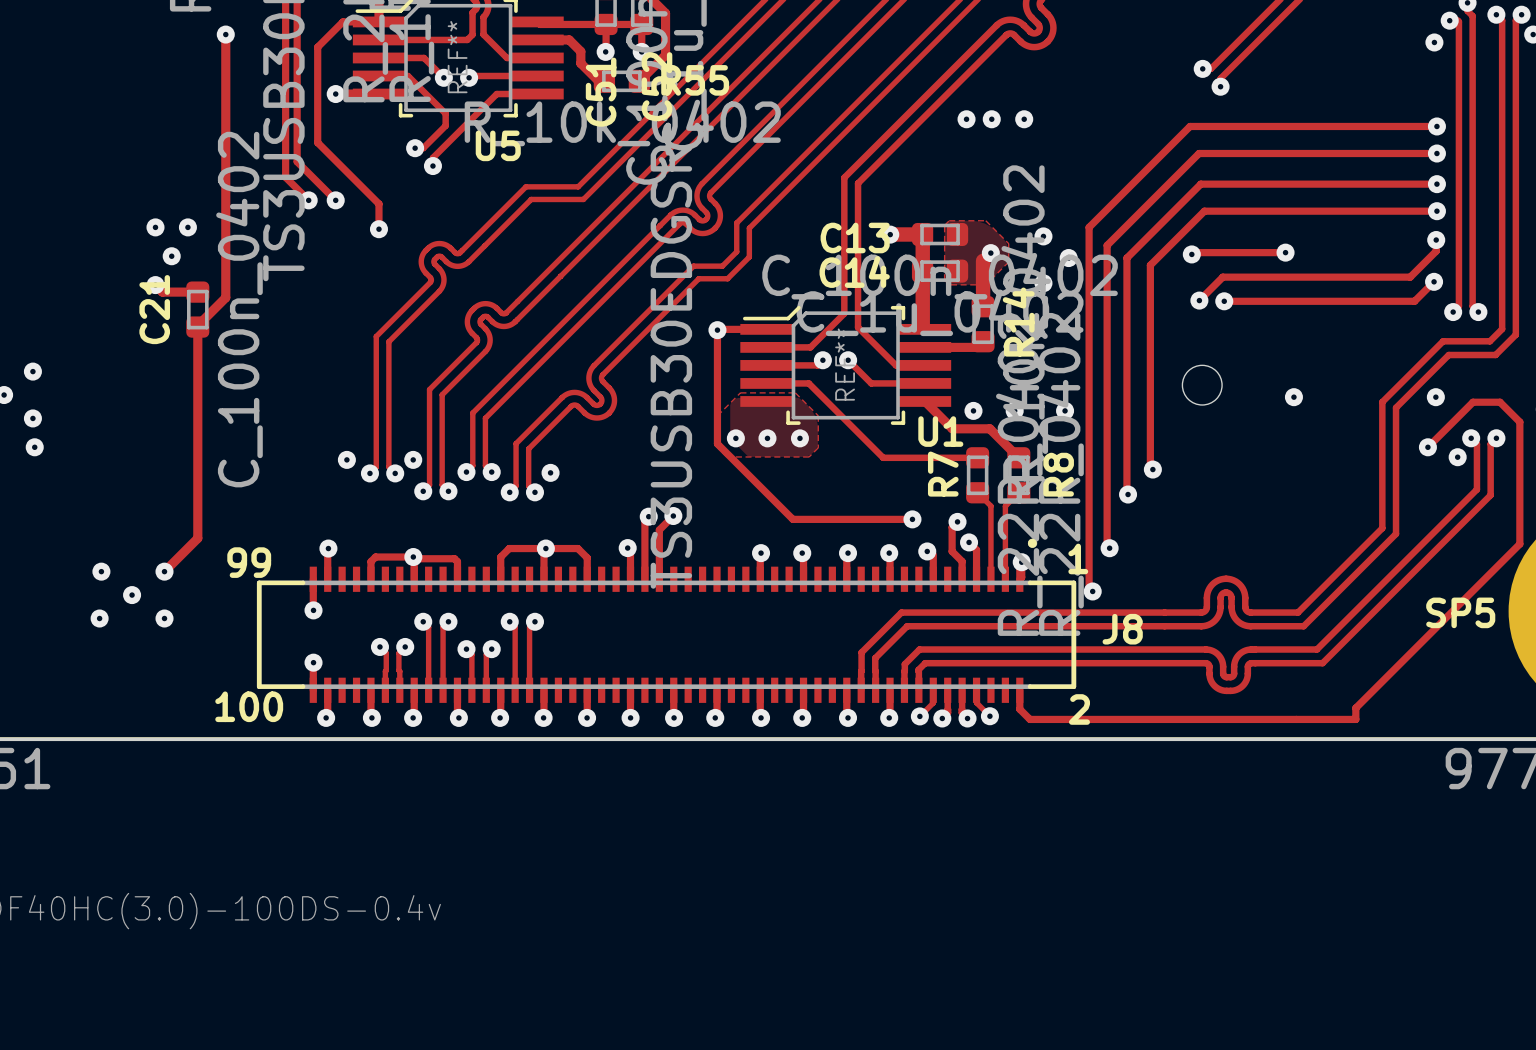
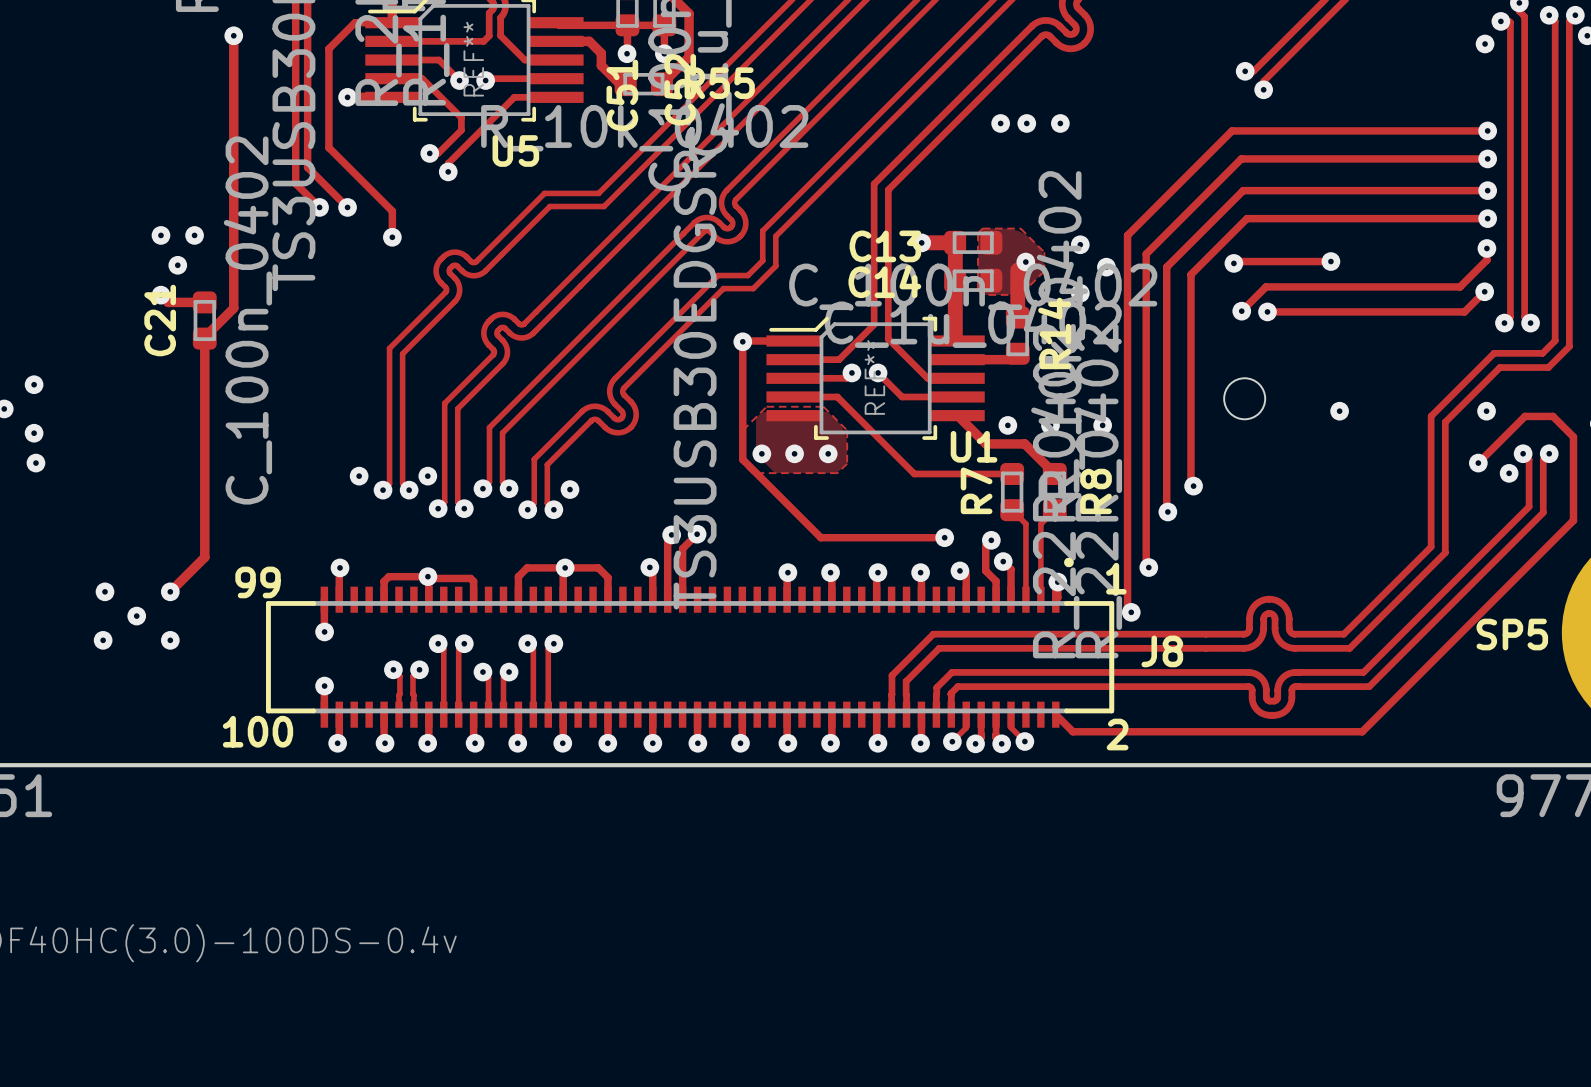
track: (1519, 502) (1519, 544) (1355, 708) (1355, 719) (1029, 719) (1019, 709) (1019, 690) -> (1573, 520) (1362, 731) (1072, 731) (1055, 714)

